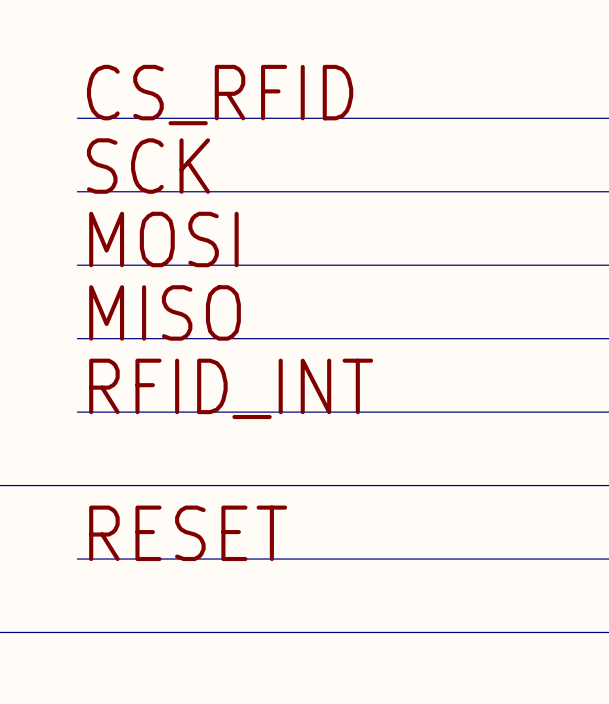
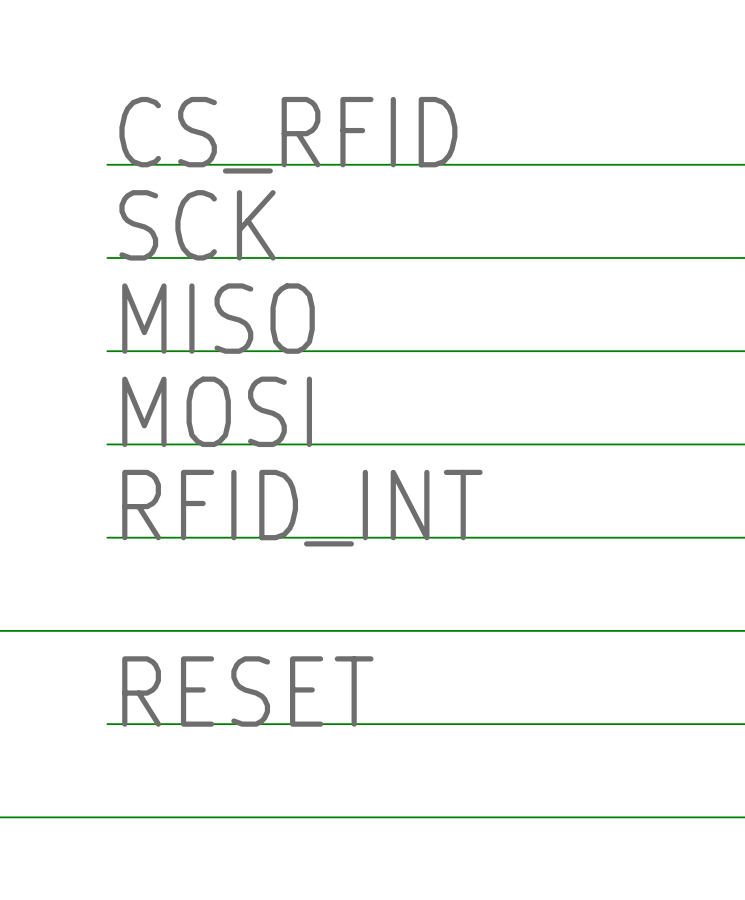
label: MOSI (163, 239) -> MISO (218, 318)
label: MISO (165, 312) -> MOSI (217, 411)

